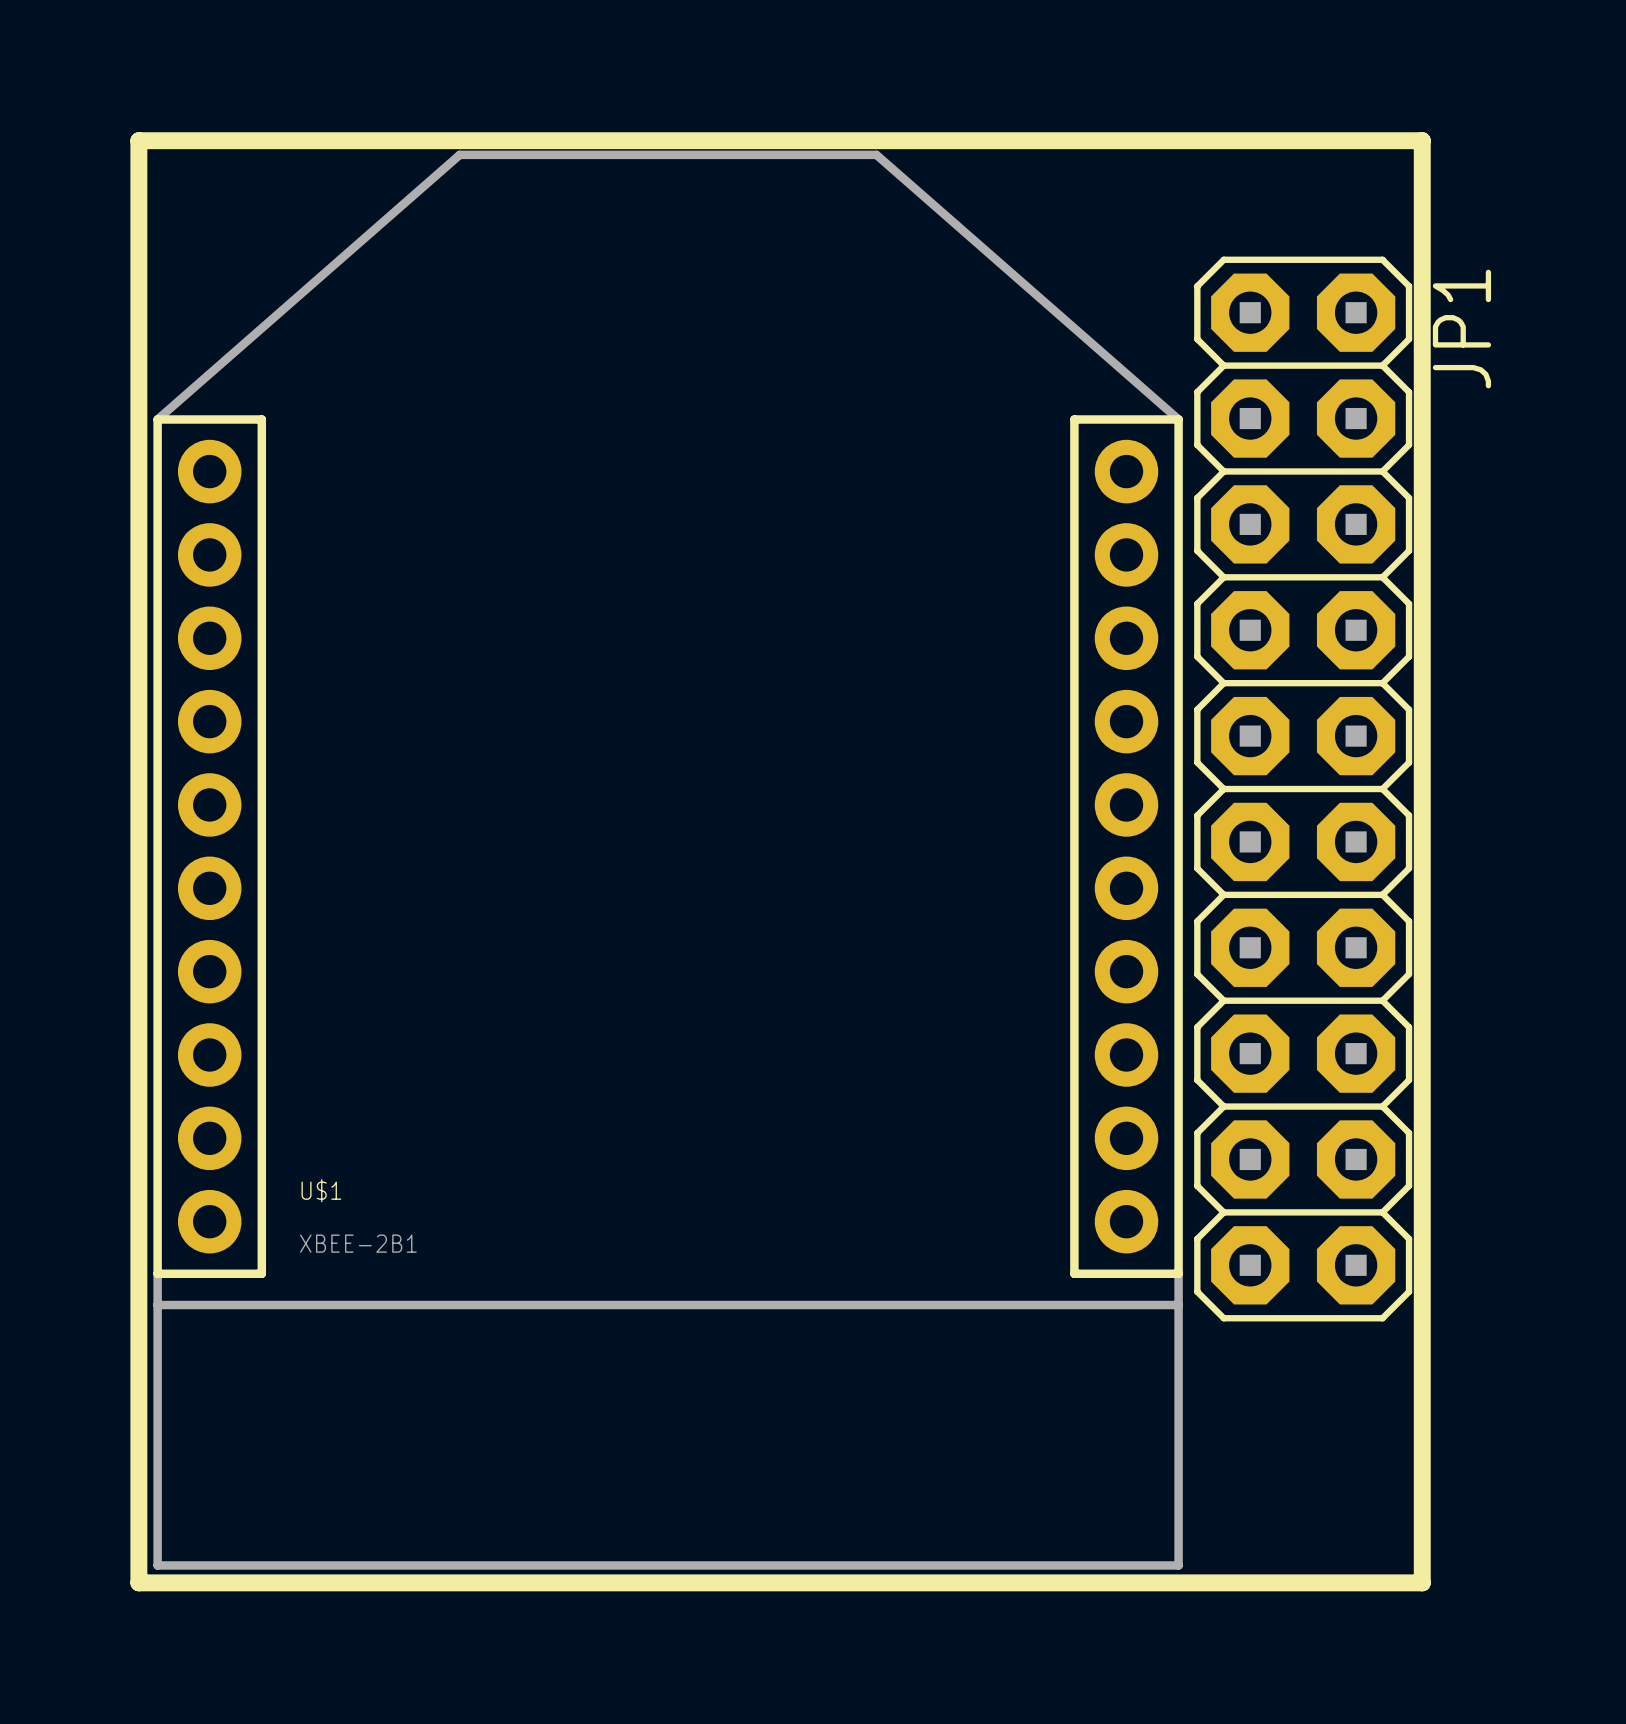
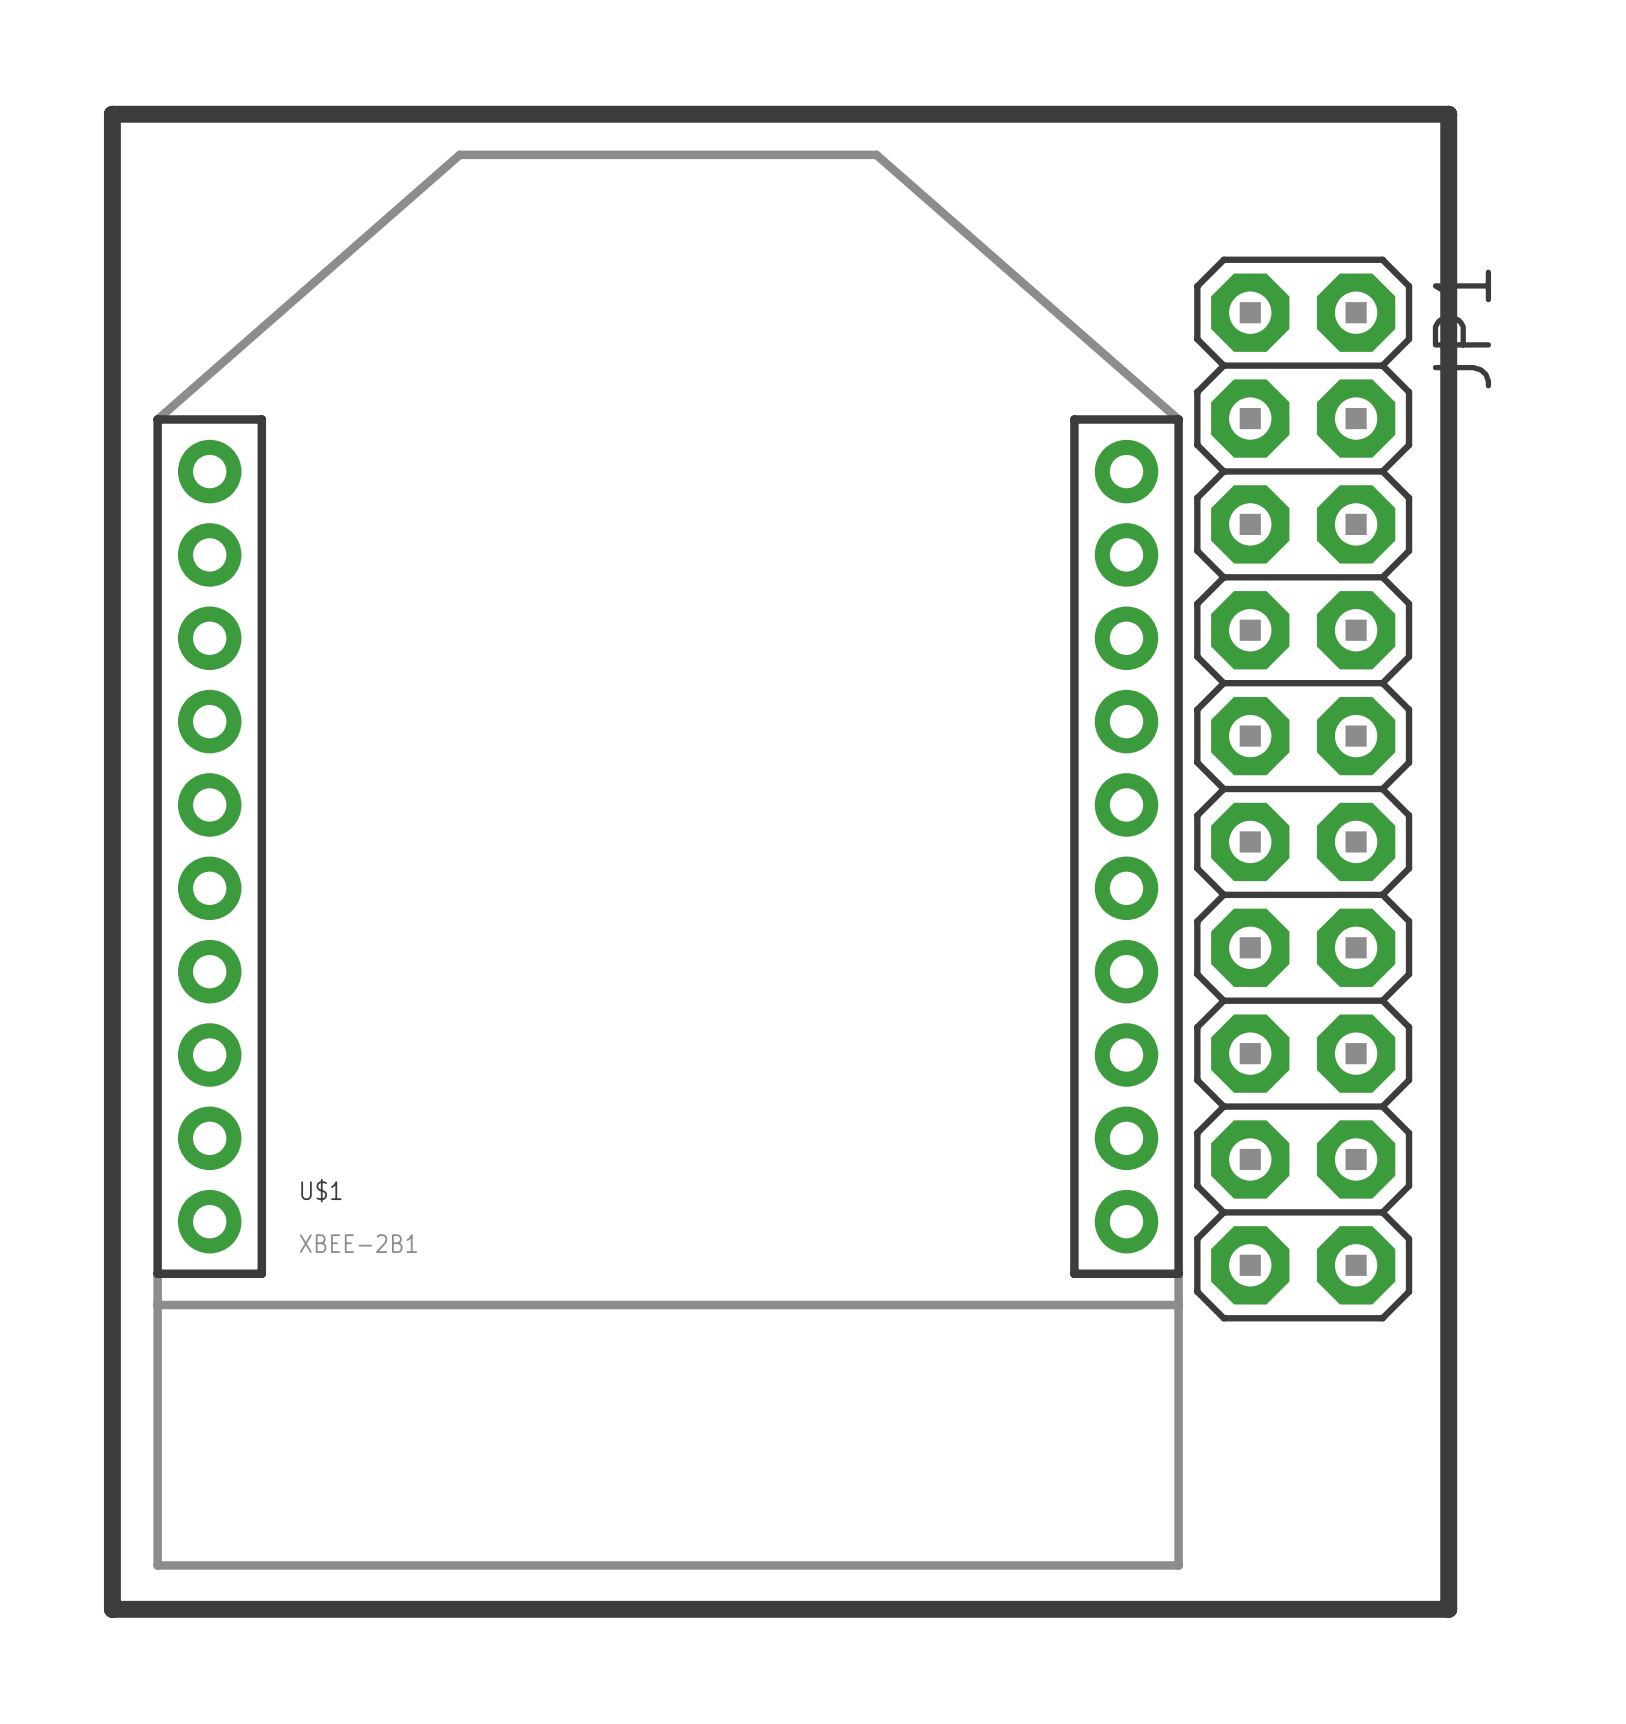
line: (138, 140) (1422, 140) (1422, 1582) (138, 1582) (138, 140) -> (112, 114) (112, 1609) (1448, 1609) (1448, 114) (112, 114)

